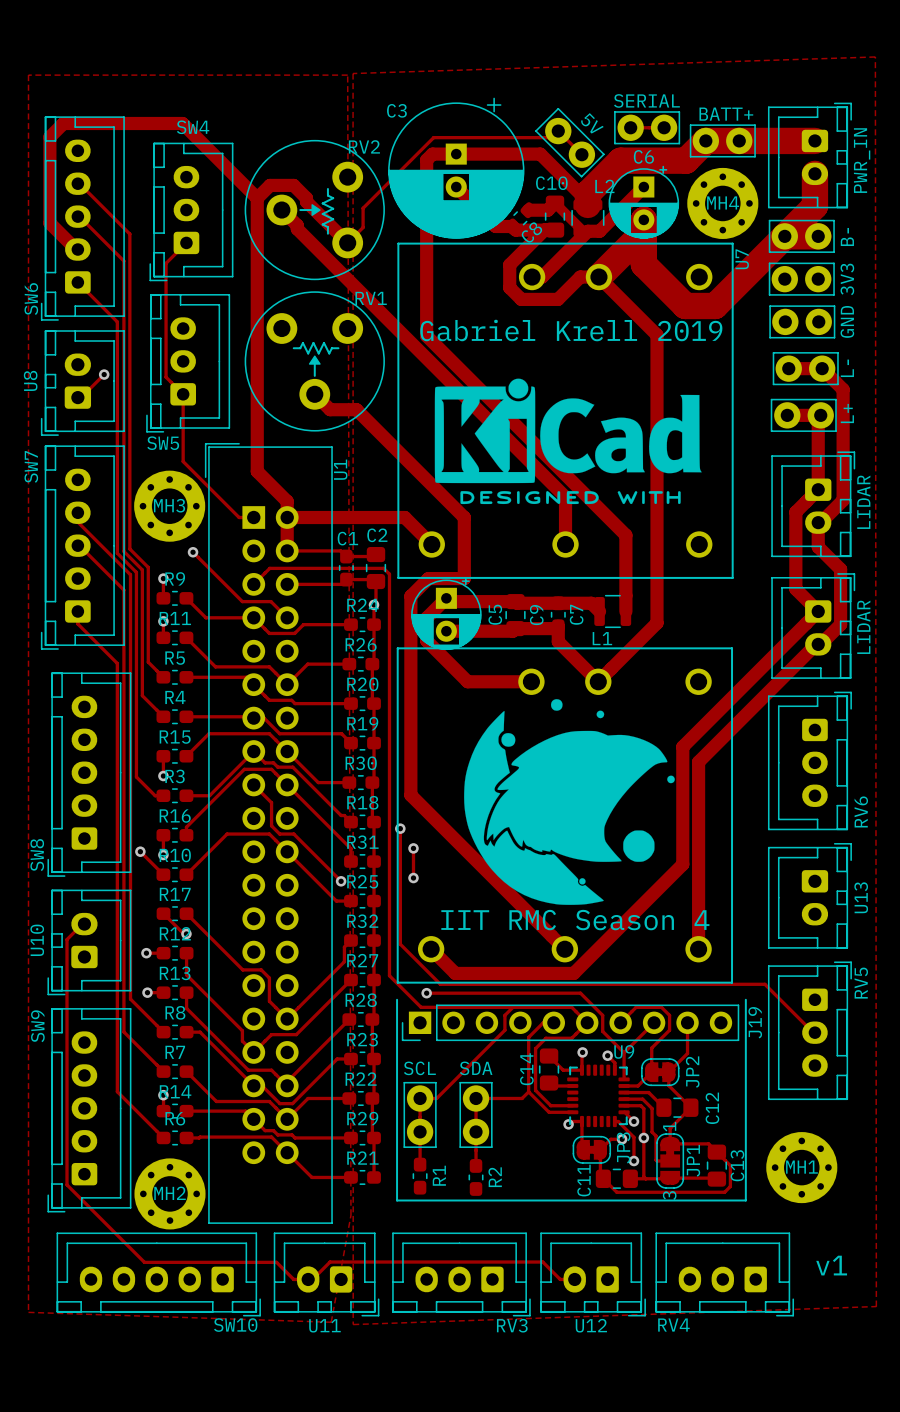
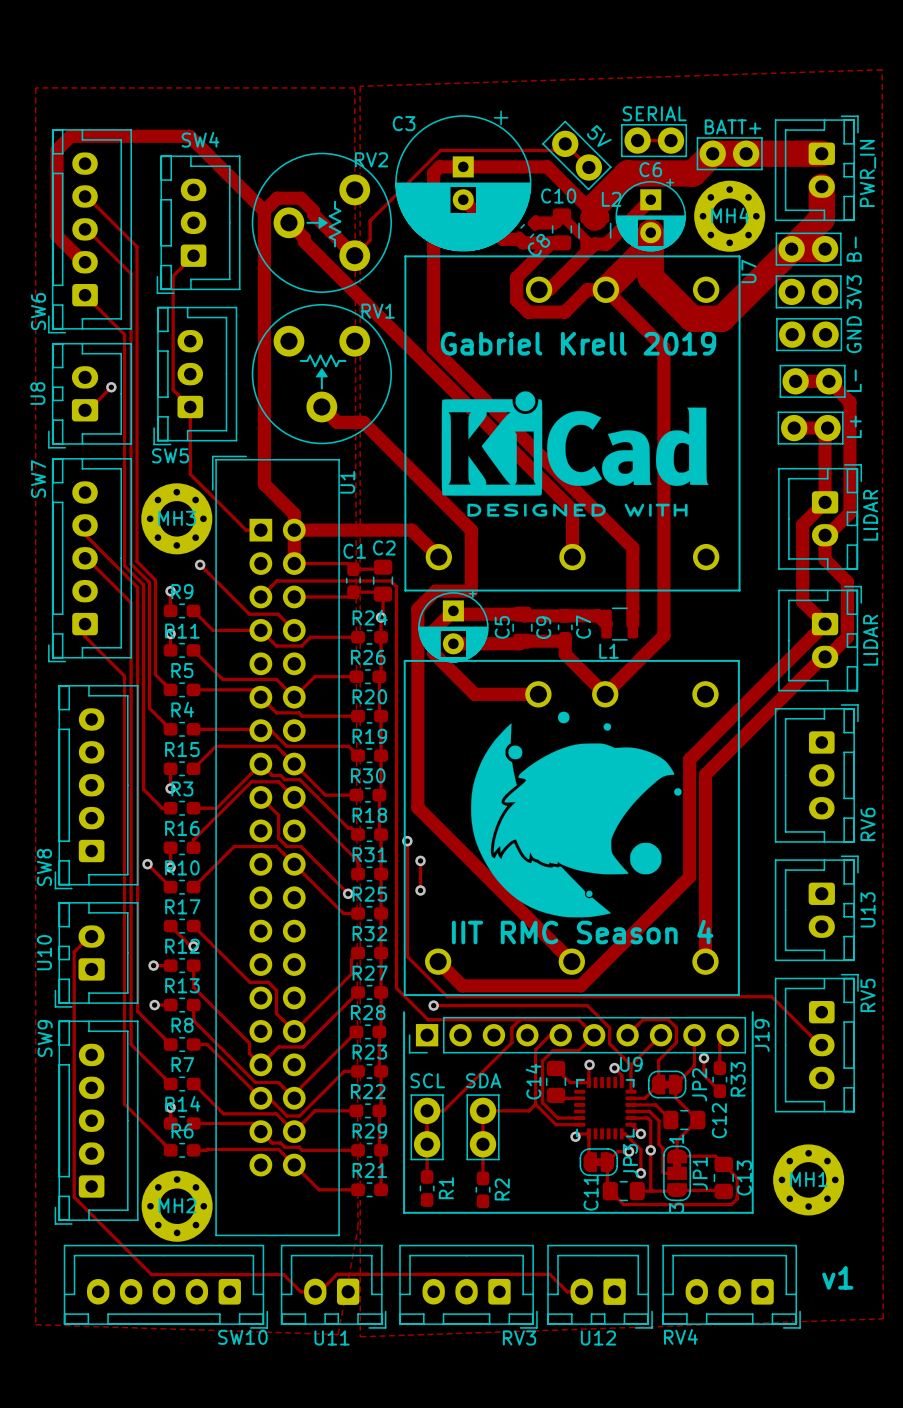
track: none -> (727, 1035) (719, 1043) (719, 1068)
track: none -> (703, 1058) (703, 1075) (719, 1091)
via: none -> (703, 1058)
R33: none -> (719, 1079)

